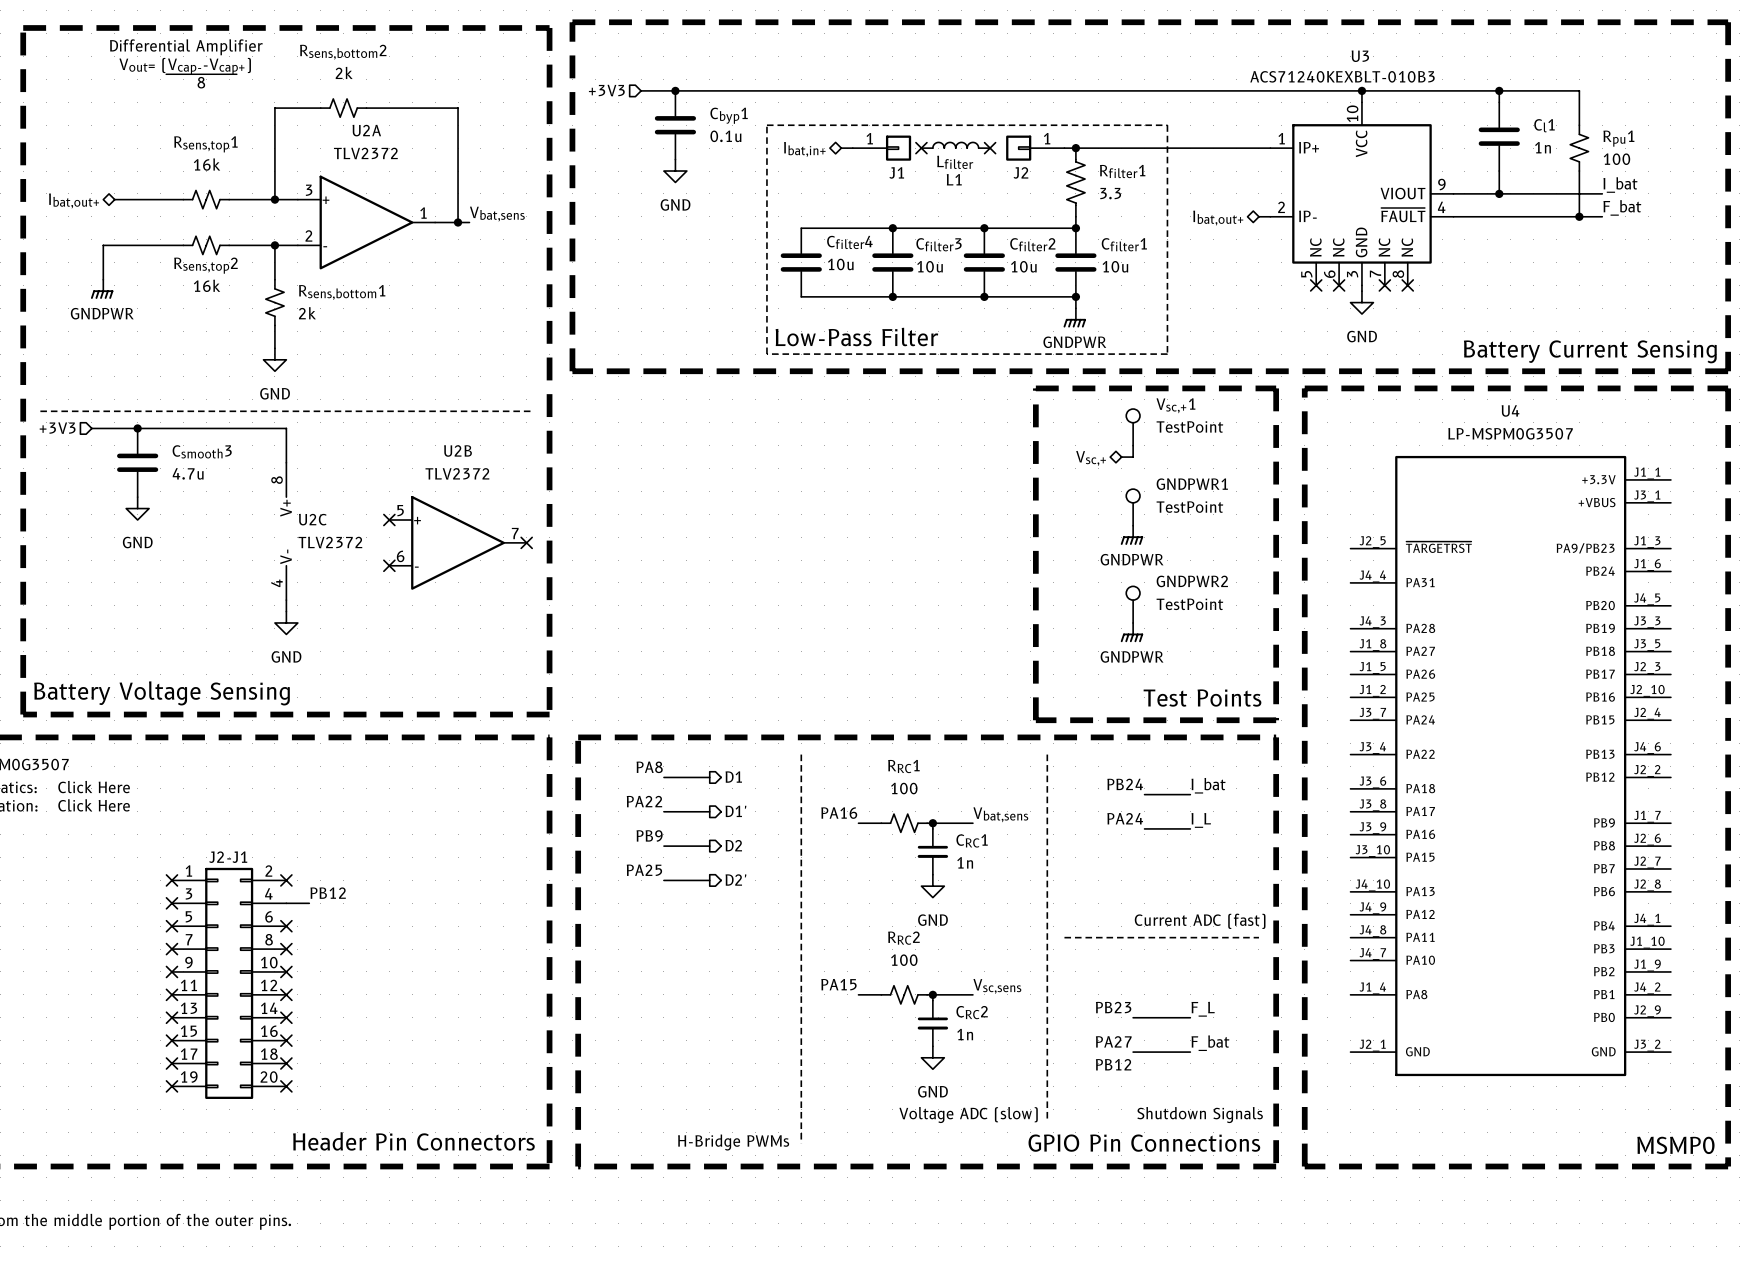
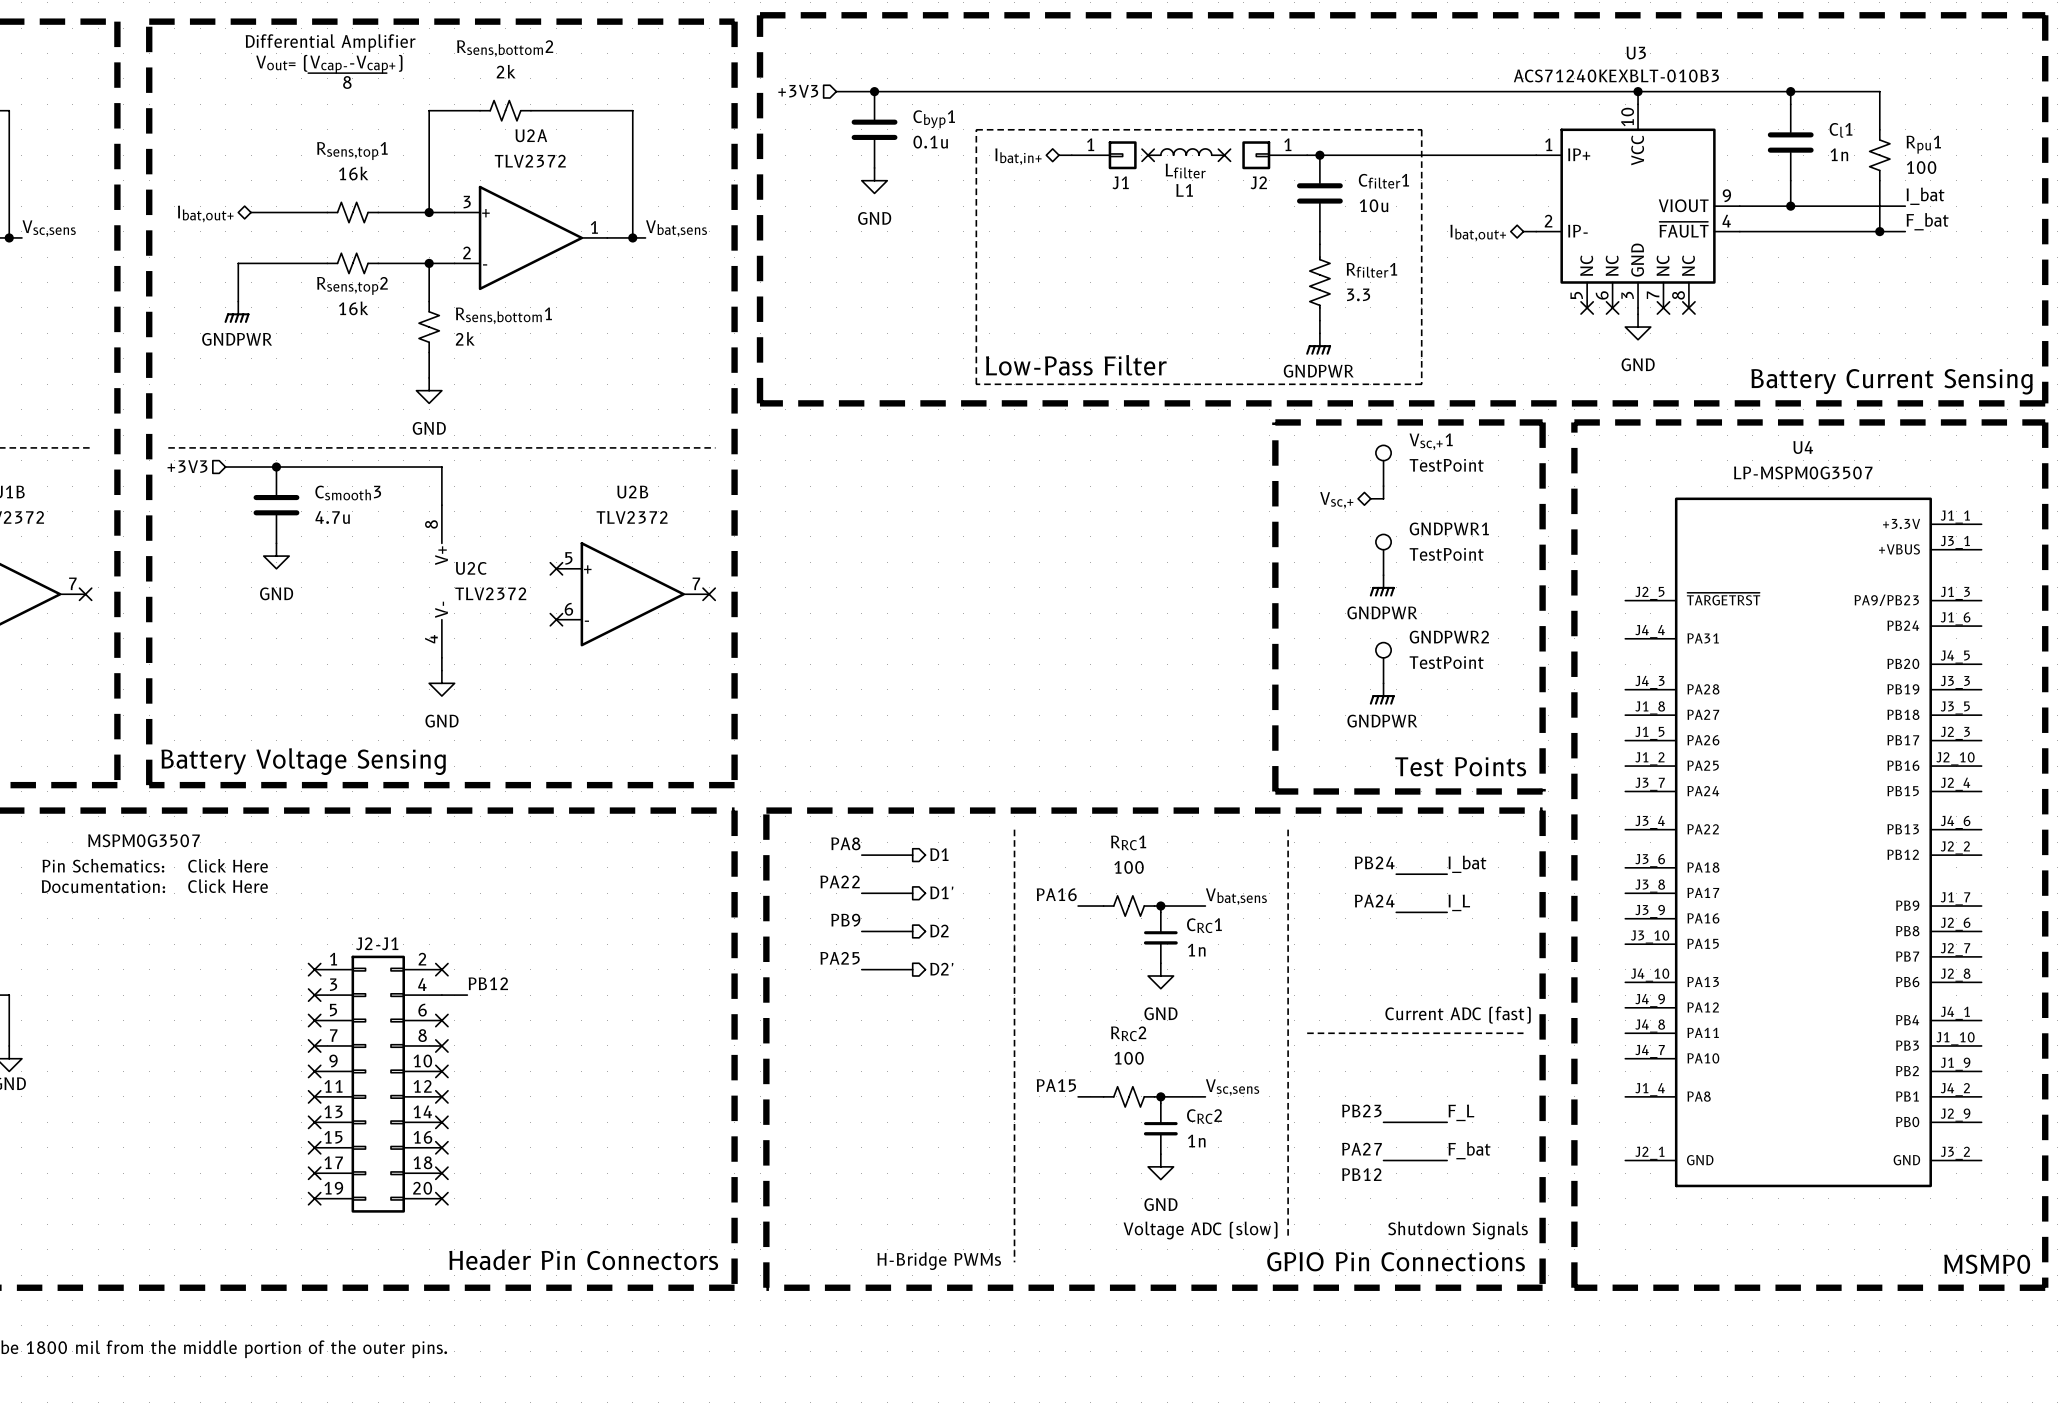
Rfilter1 position: (1075, 182) -> (1319, 282)
wire: (801, 228) (1075, 228) -> none
junction: (892, 228) -> none
junction: (984, 228) -> none
junction: (1075, 228) -> none
Cfilter1 name position: Cfilter1 (1124, 244) -> Cfilter1 (1383, 181)
Cfilter4: 10u (801, 262) -> none
Cfilter3: 10u (892, 262) -> none
Cfilter2: 10u (984, 262) -> none
Cfilter1 position: (1075, 262) -> (1319, 193)
Cfilter1 value position: 10u (1115, 266) -> 10u (1373, 205)
wire: (801, 296) (1075, 296) -> none
junction: (892, 296) -> none
junction: (984, 296) -> none
junction: (1075, 296) -> none

